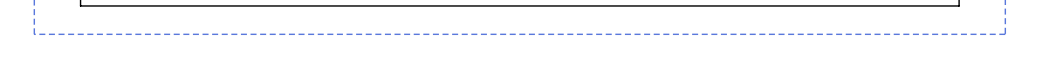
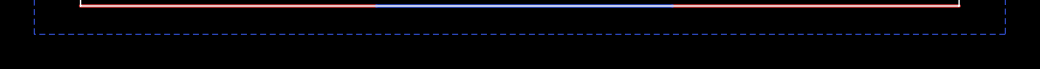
top track: none -> (376, 5) (80, 5)
bottom track: none -> (672, 5) (376, 5)
top track: none -> (959, 5) (672, 5)

